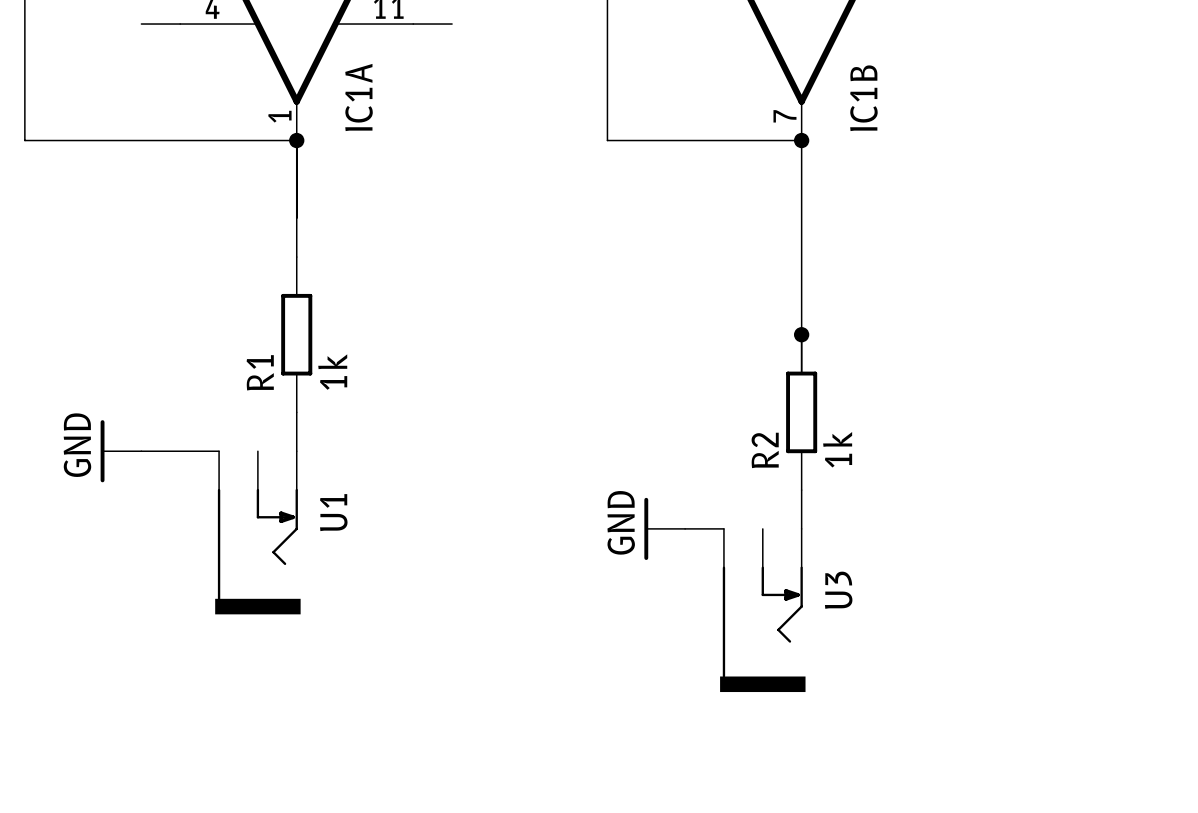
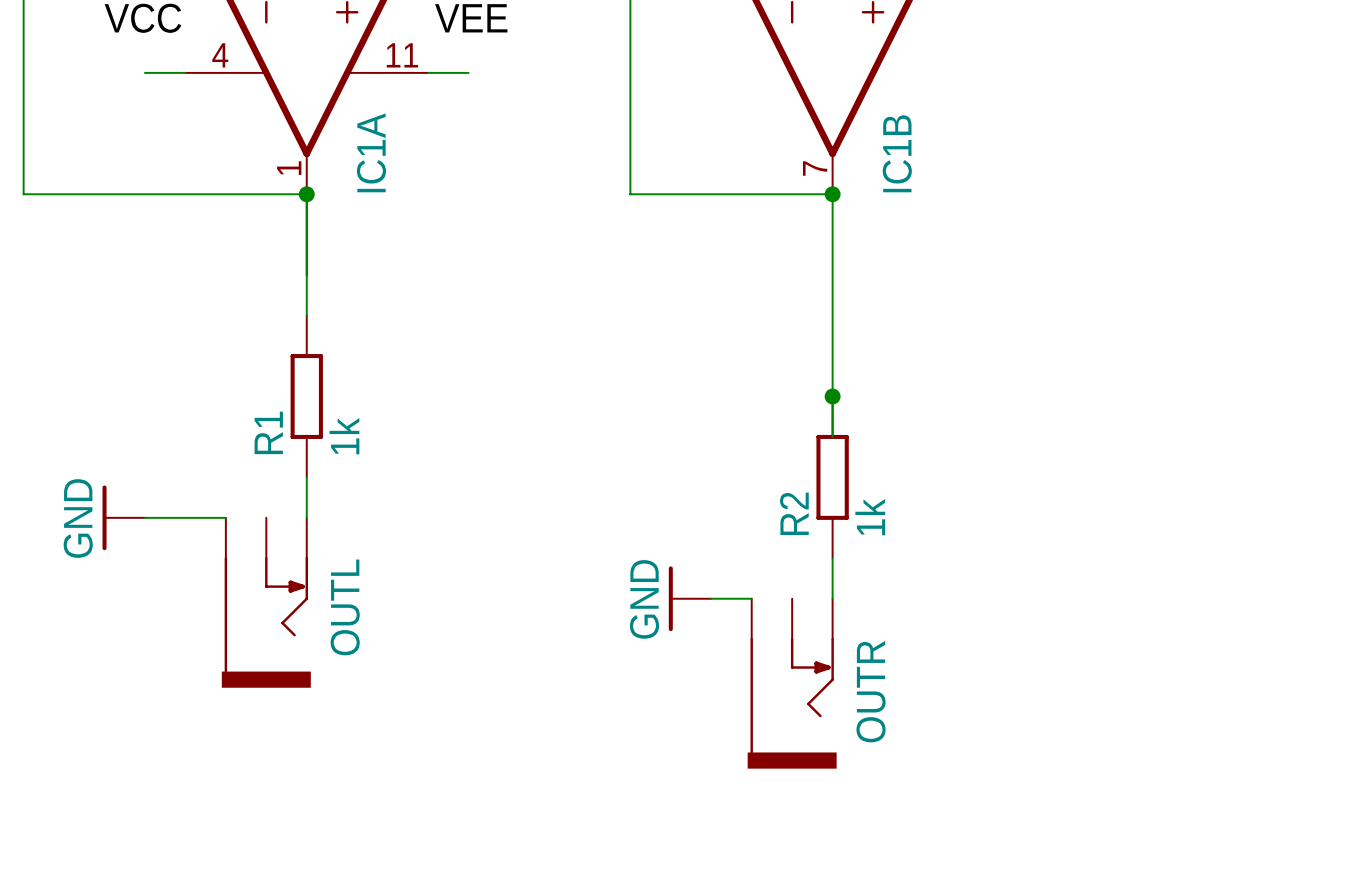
U1 name: U1 (333, 512) -> OUTL (345, 607)
U3 name: U3 (838, 590) -> OUTR (871, 691)

